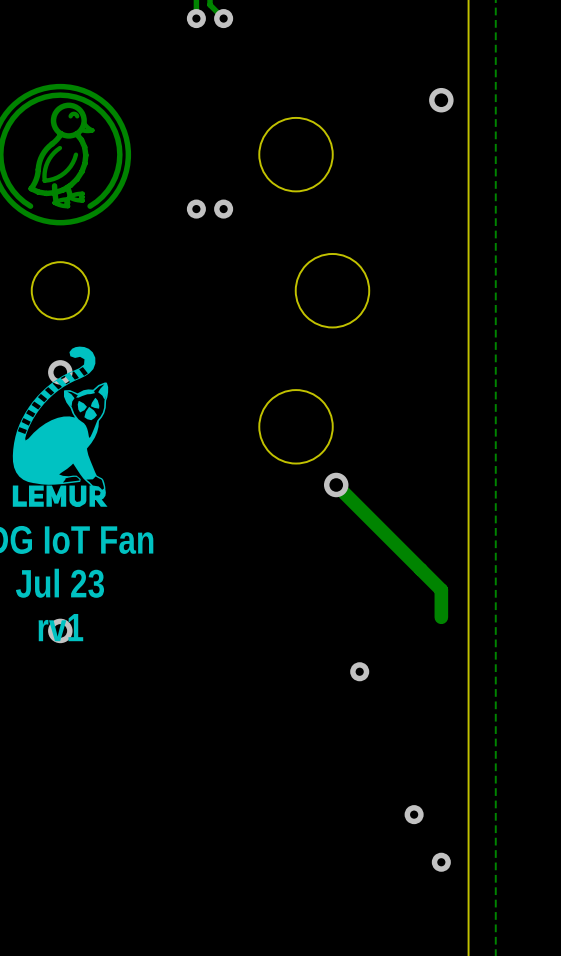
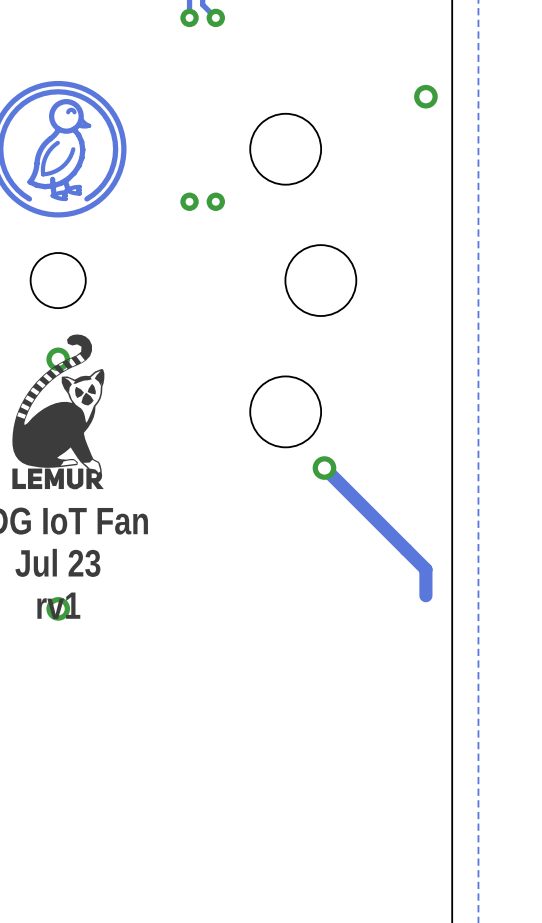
via: (359, 671) -> none
via: (414, 814) -> none
via: (441, 862) -> none

